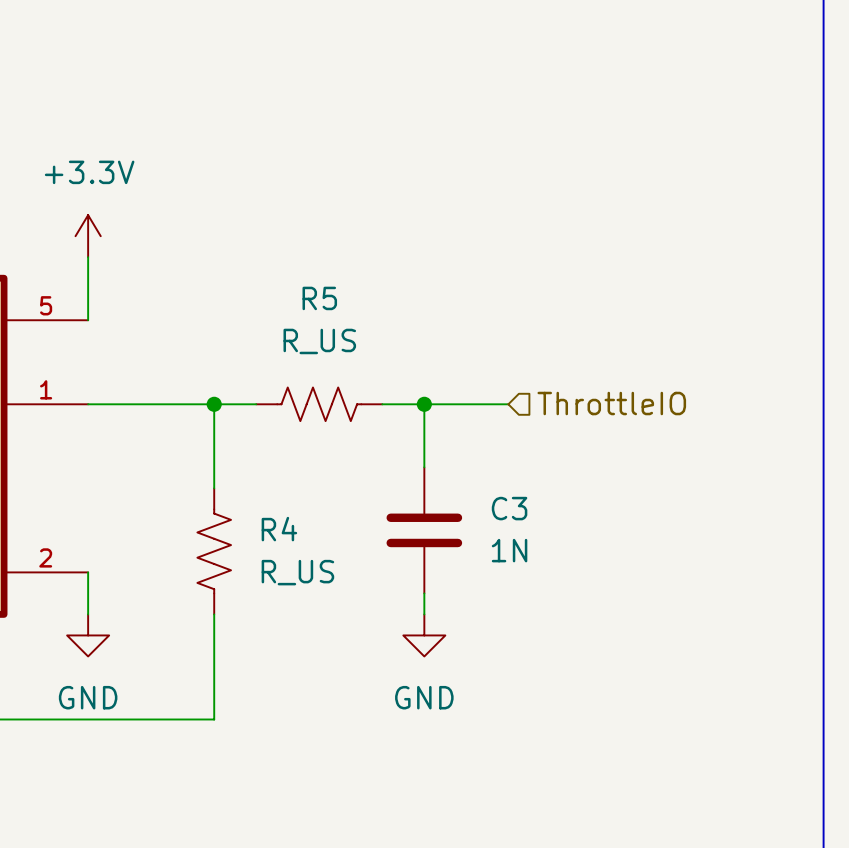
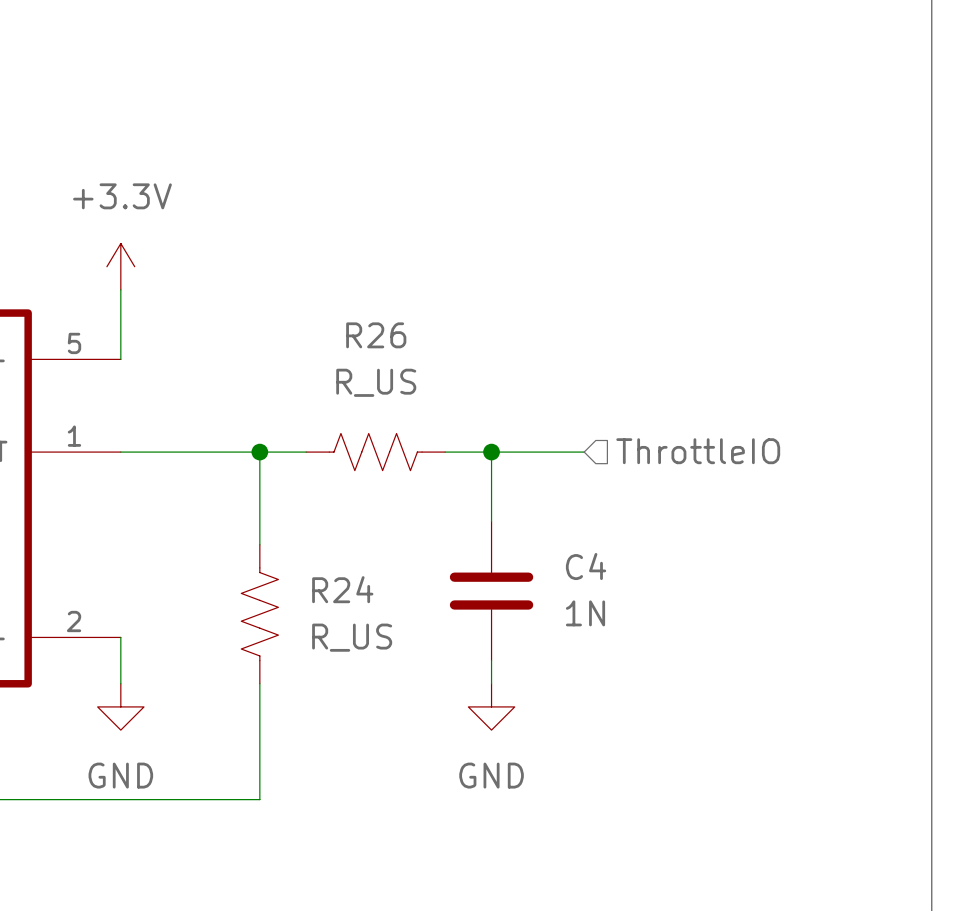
R5 name: R5 (319, 298) -> R26 (376, 335)
C3 name: C3 (509, 508) -> C4 (586, 566)
R4 name: R4 (279, 529) -> R24 (342, 589)

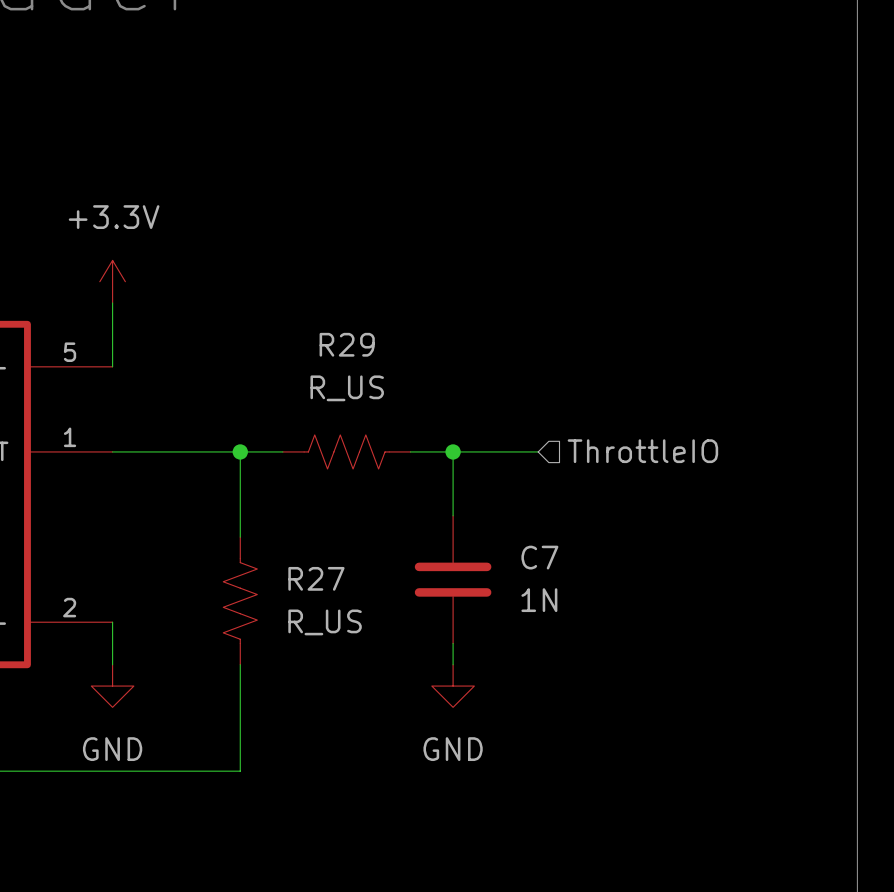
R26 name: R26 (376, 335) -> R29 (347, 344)
C4 name: C4 (586, 566) -> C7 (539, 557)
R24 name: R24 (342, 589) -> R27 (316, 578)

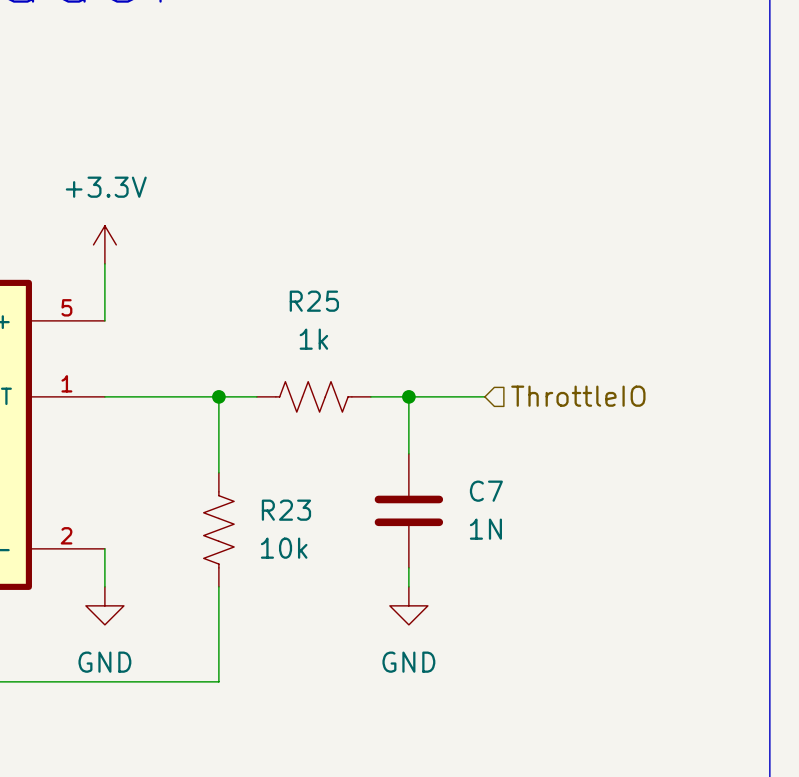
R29 name: R29 (347, 344) -> R25 (314, 301)
R29 value: R_US (347, 388) -> 1k (313, 339)
R27 name: R27 (316, 578) -> R23 (286, 510)
R27 value: R_US (325, 622) -> 10k (284, 548)

